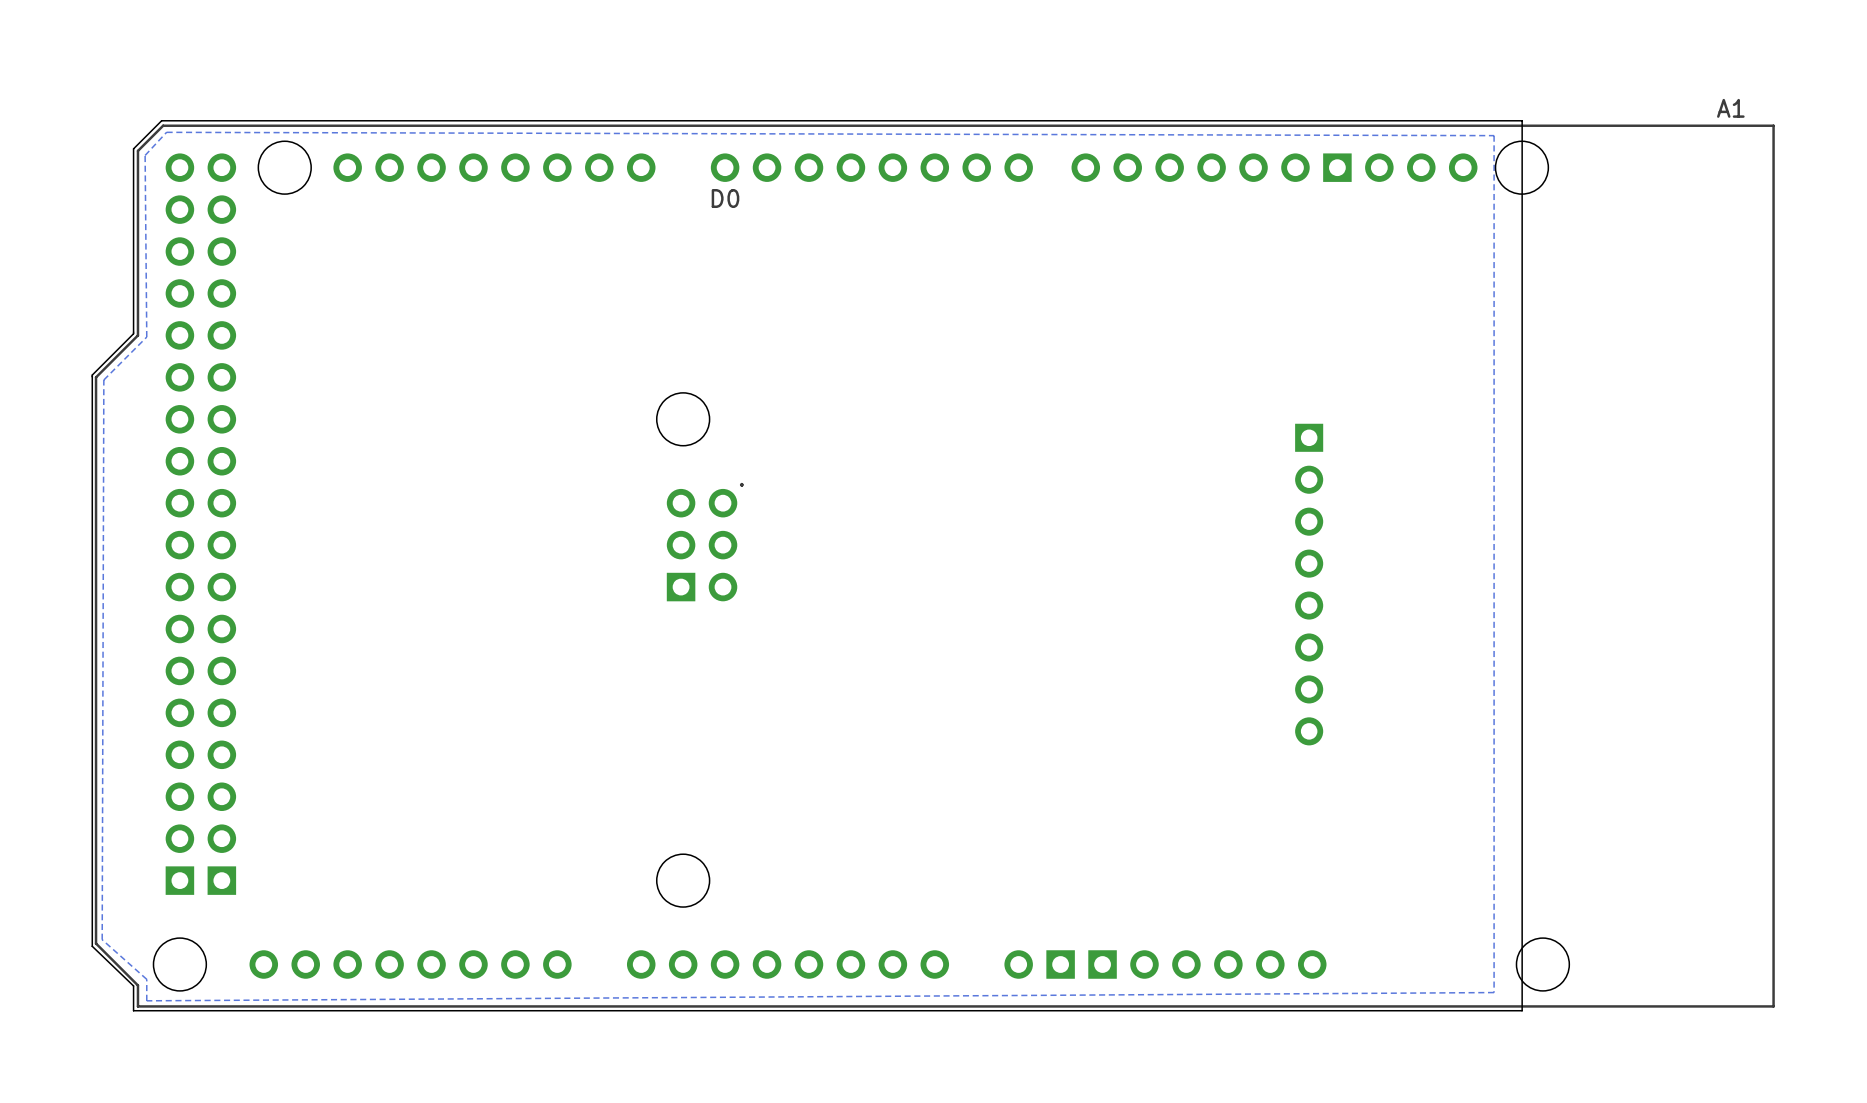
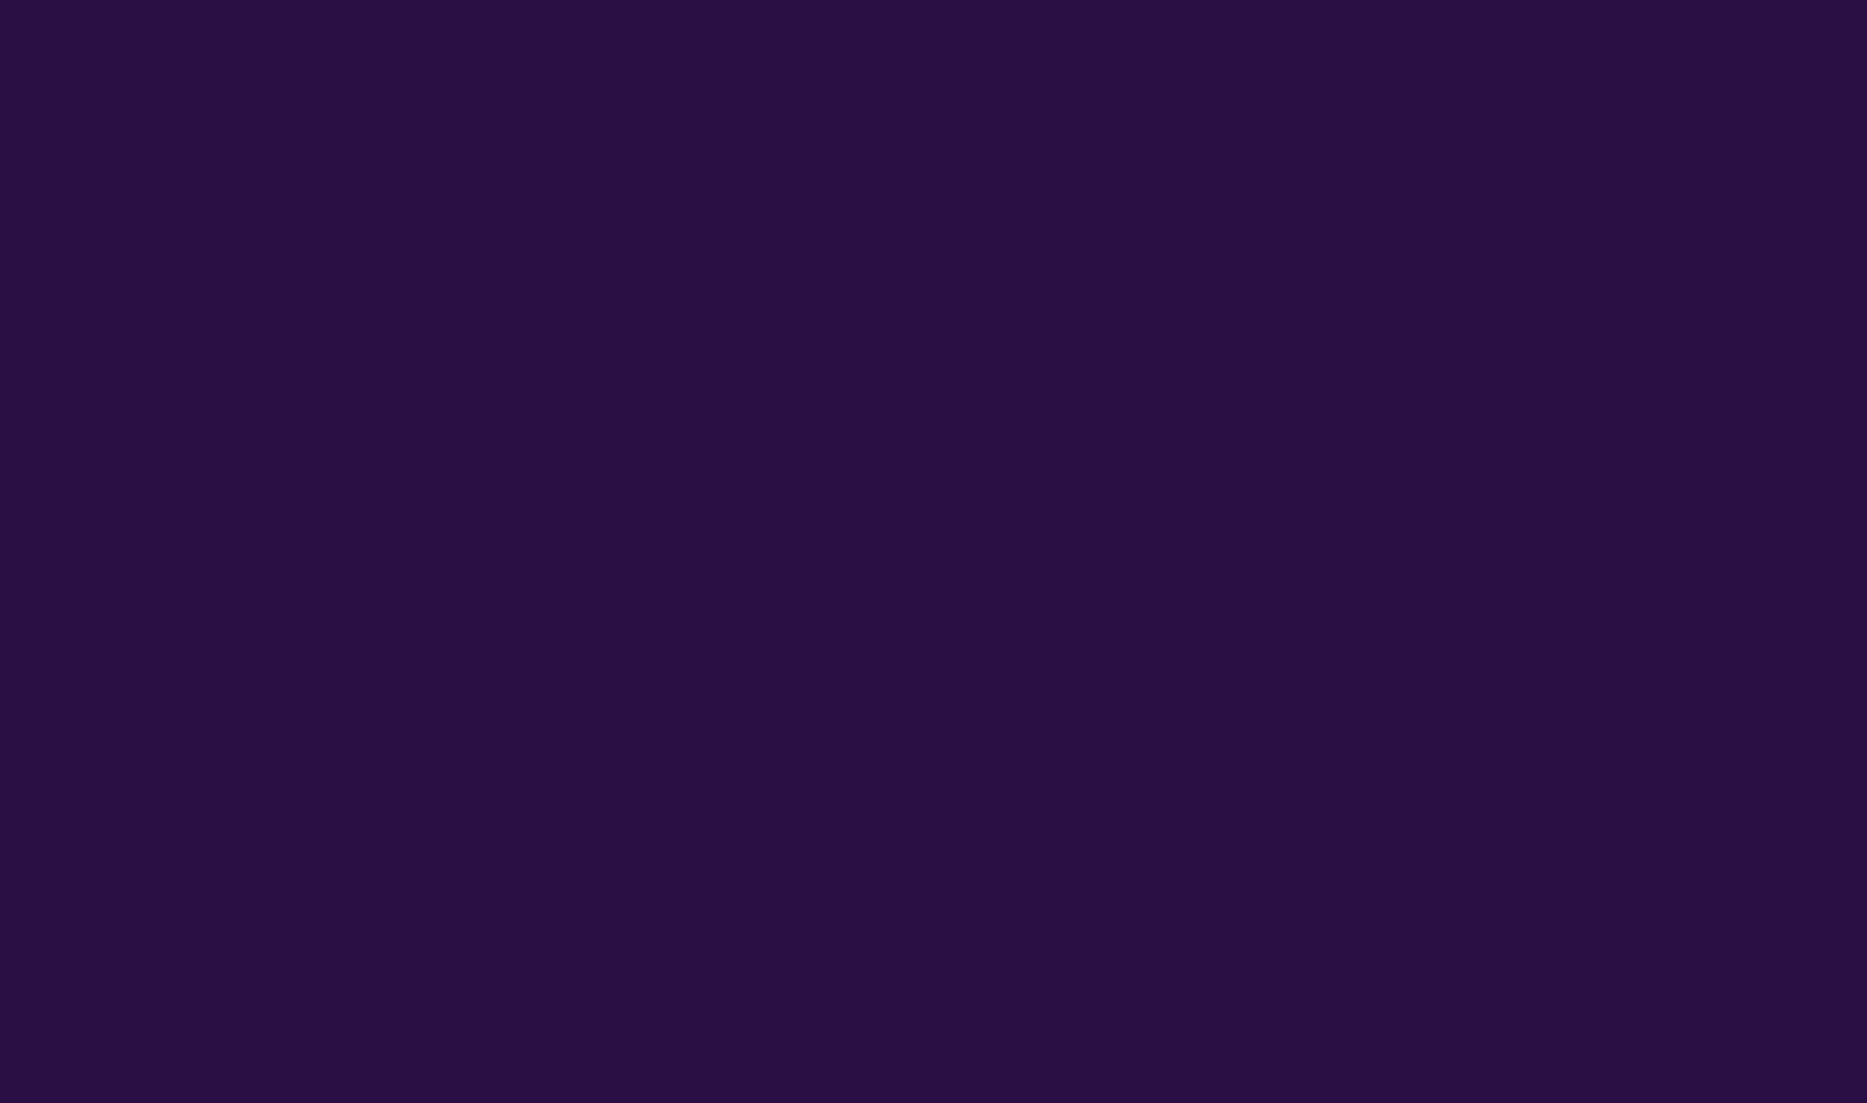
board edge: (1522, 120) (1522, 1010) (133, 1010) (133, 985) (92, 946) (92, 375) (133, 333) (133, 148) (161, 120) (1522, 120) -> none
zone outline: (166, 132) (145, 155) (146, 337) (103, 380) (102, 939) (146, 979) (146, 1000) (1494, 992) (1494, 135) (166, 132) -> none
A1: (934, 566) -> none
part: (1309, 584) -> none

